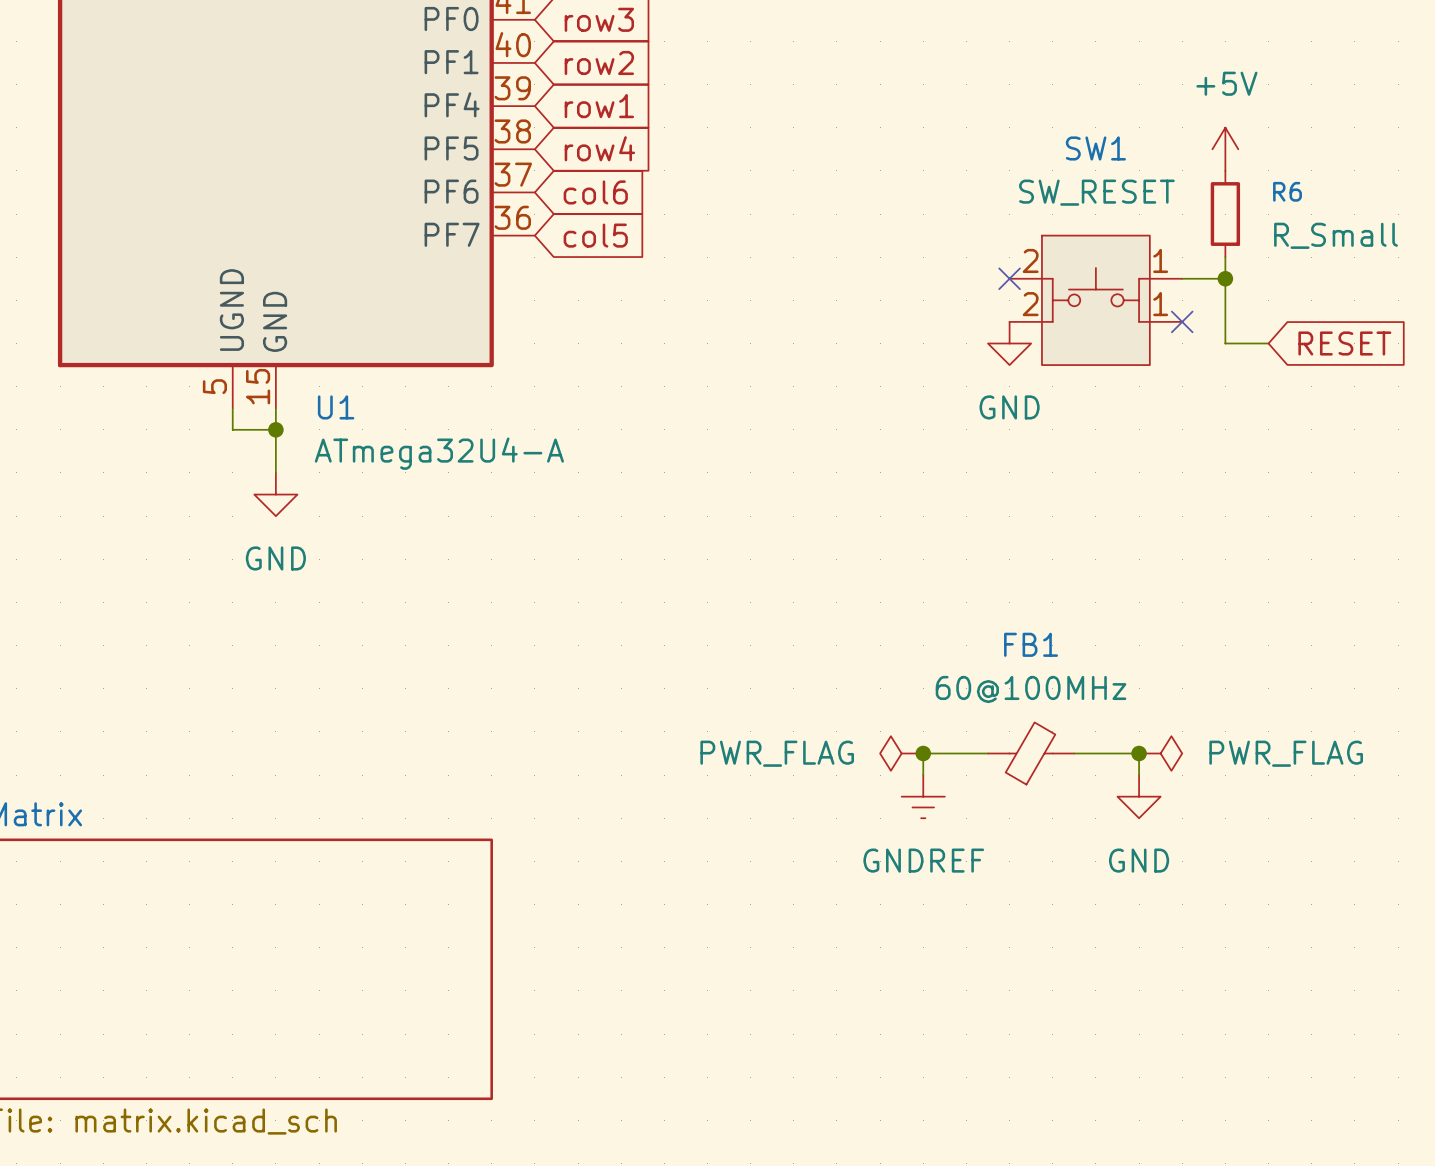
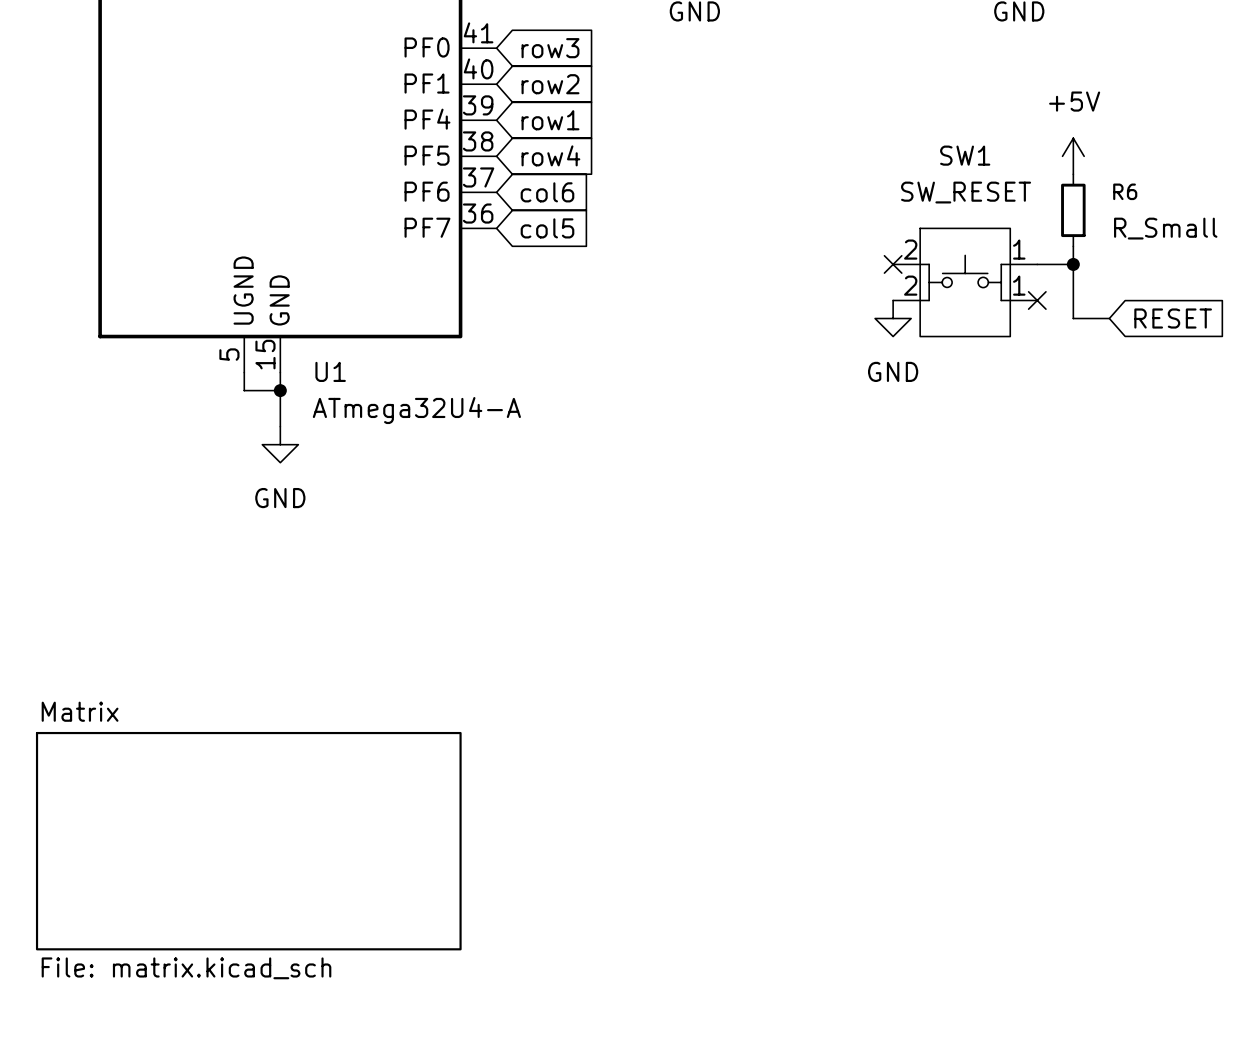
power symbol: PWR_FLAG (901, 753) -> none
junction: (923, 753) -> none
wire: (988, 753) (923, 753) (923, 775) -> none
FB1: 60@100MHz (1031, 753) -> none
wire: (1074, 753) (1139, 753) (1139, 775) -> none
junction: (1139, 753) -> none
power symbol: PWR_FLAG (1160, 753) -> none
power symbol: GNDREF (923, 796) -> none
power symbol: GND (1139, 796) -> none

